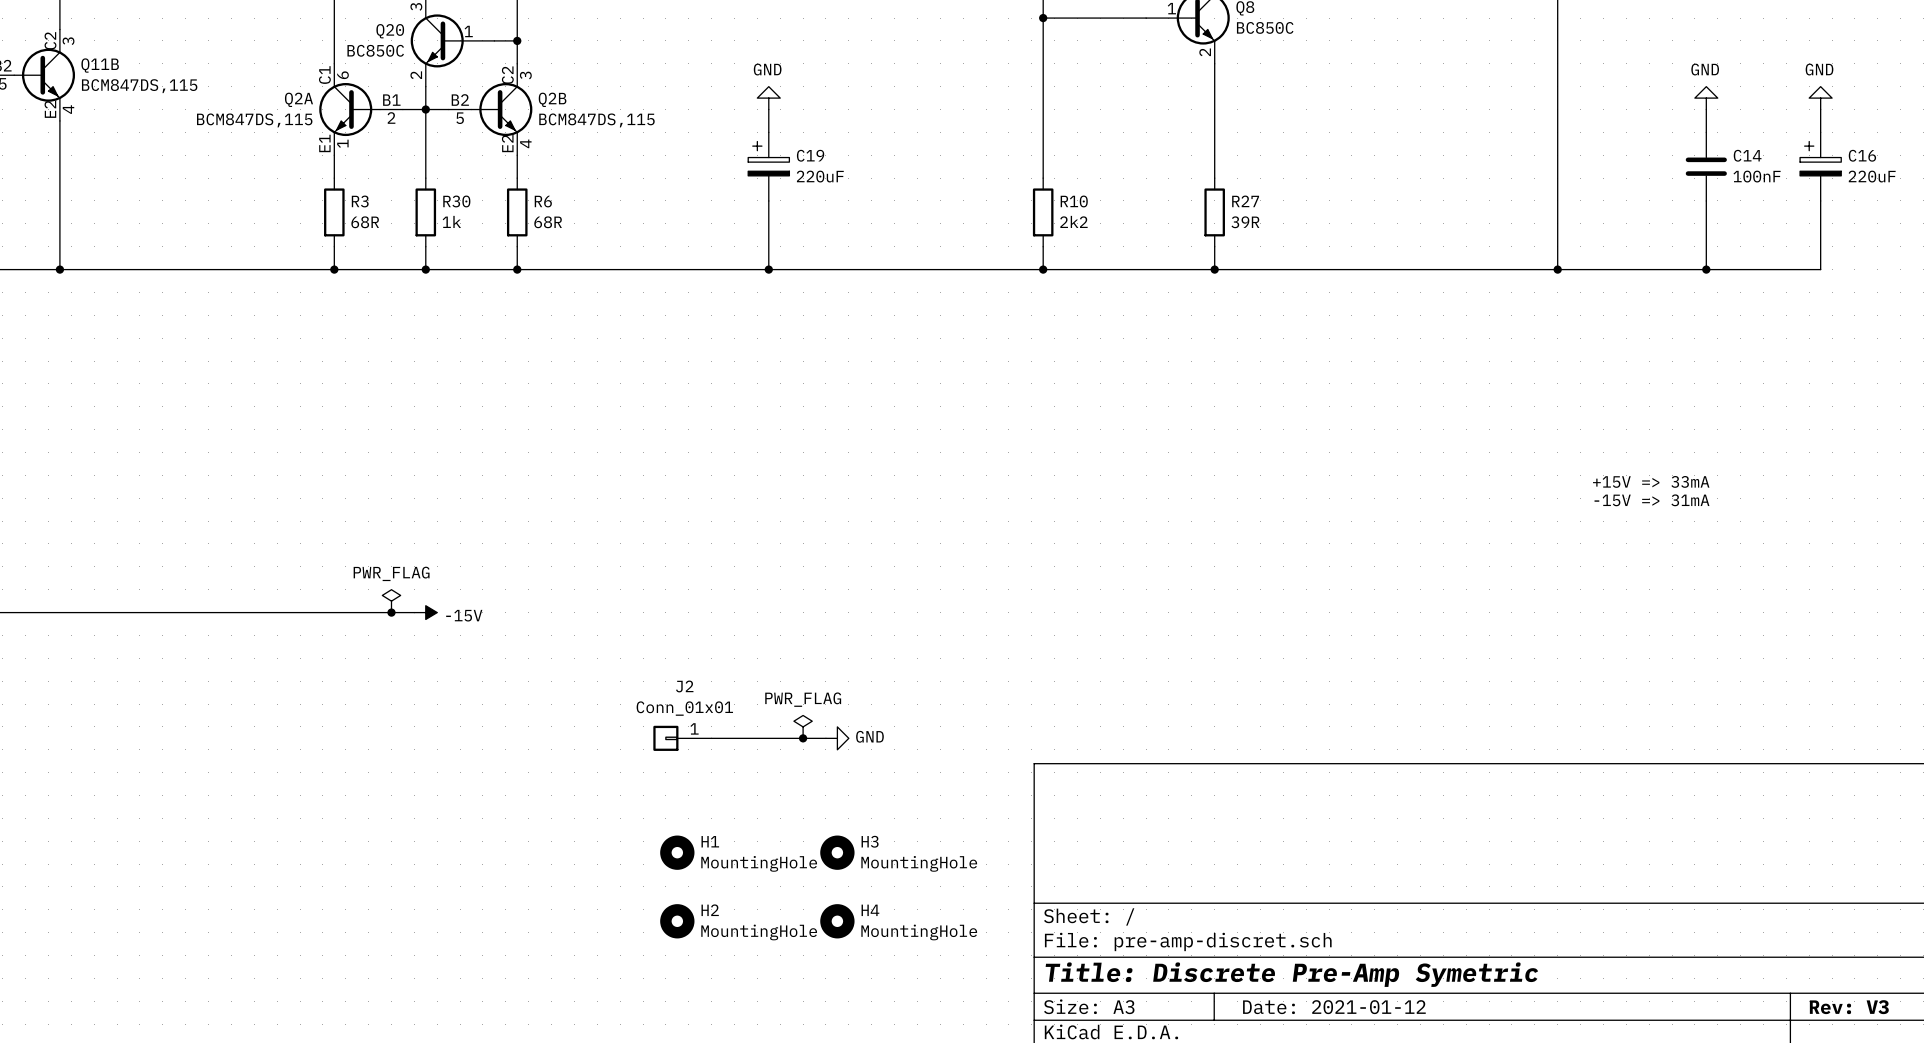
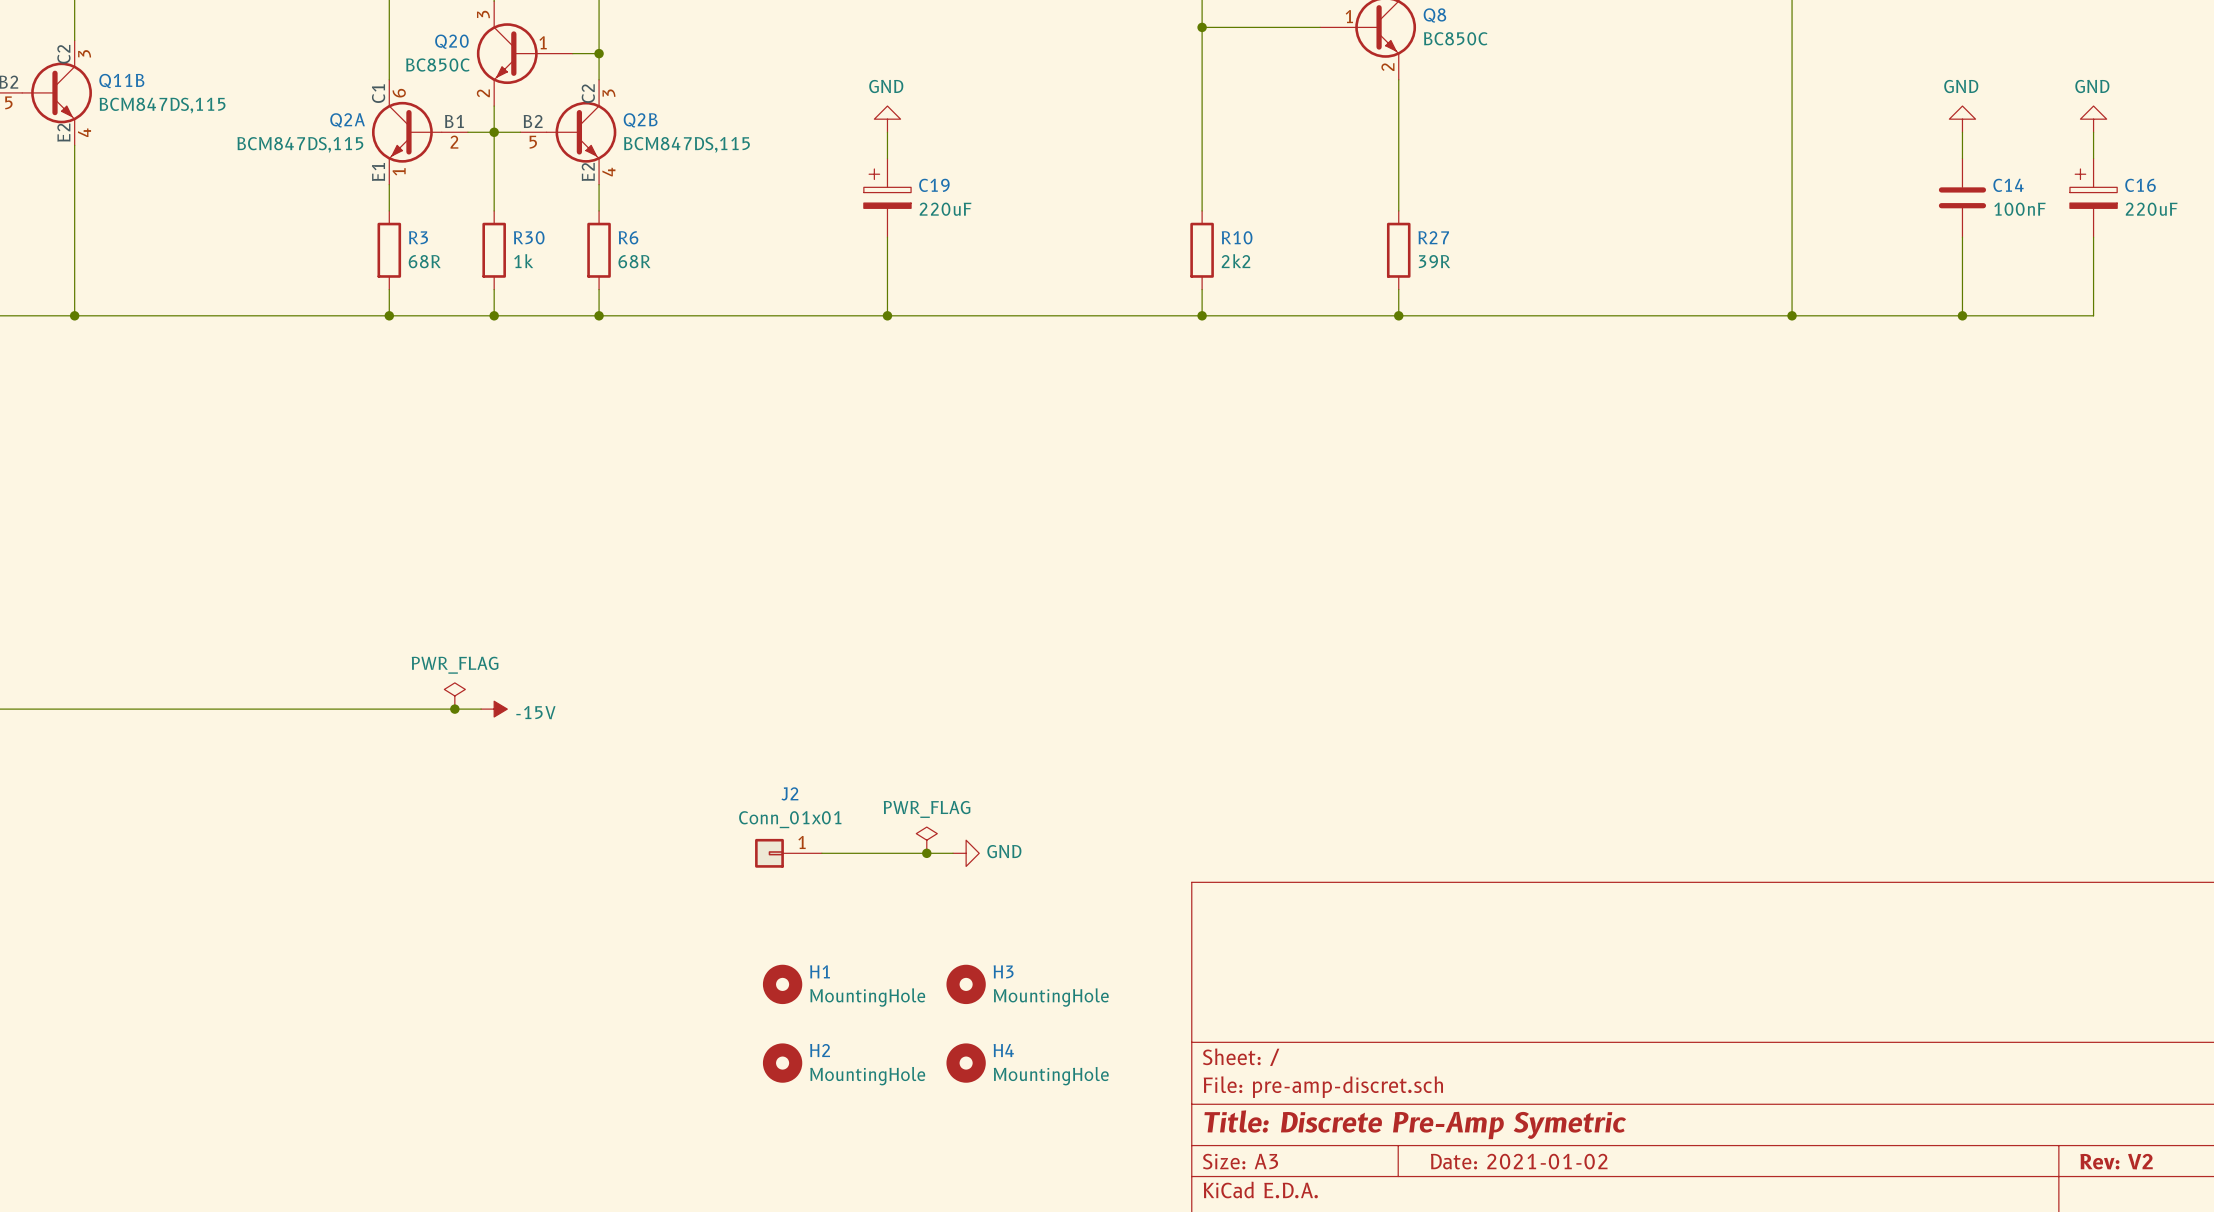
text: +15V => 33mA (1651, 481) -> none
text: -15V => 31mA (1651, 500) -> none
title block: Date: 2021-01-12 (1334, 1007) -> Date: 2021-01-02 (1519, 1161)
title block: Rev: V3 (1849, 1007) -> Rev: V2 (2116, 1161)

